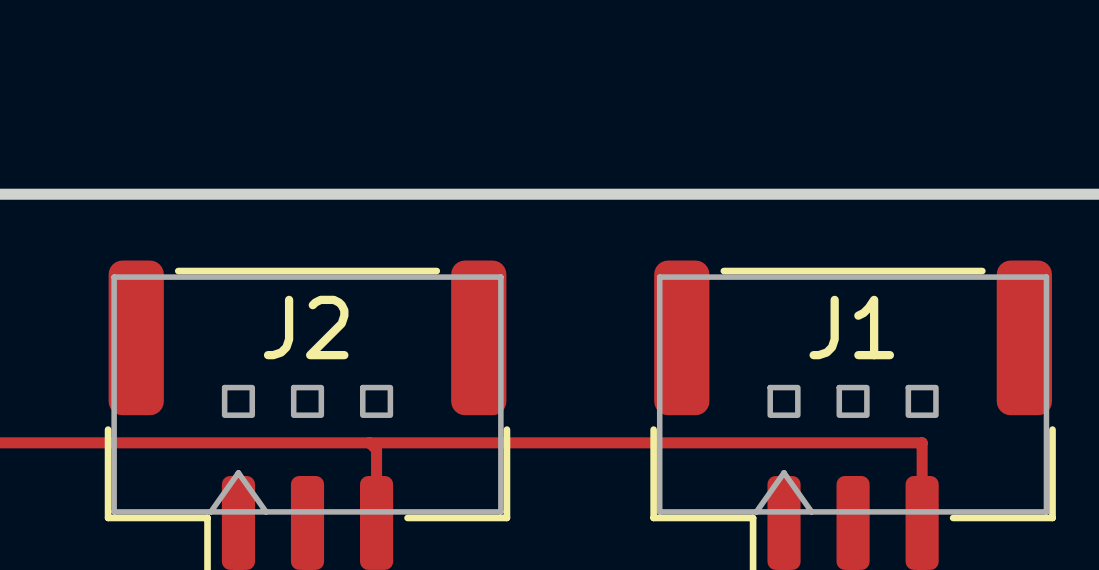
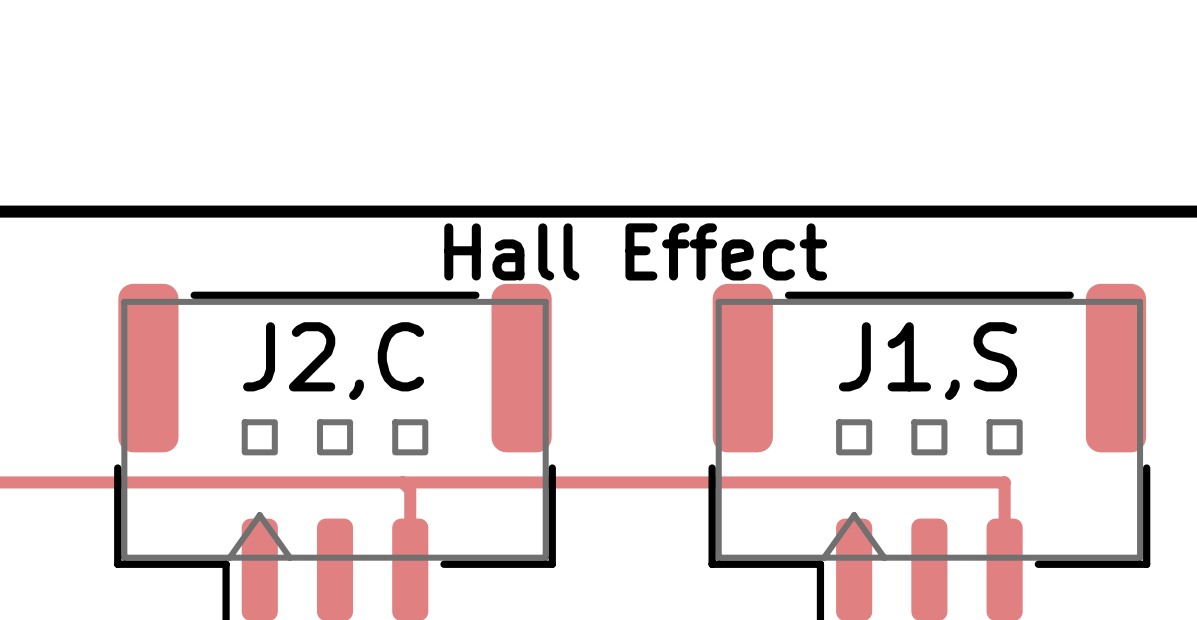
text: none -> Hall Effect (635, 251)
J2 name: J2 (306, 327) -> J2,C (333, 361)
J1 name: J1 (851, 327) -> J1,S (927, 361)

